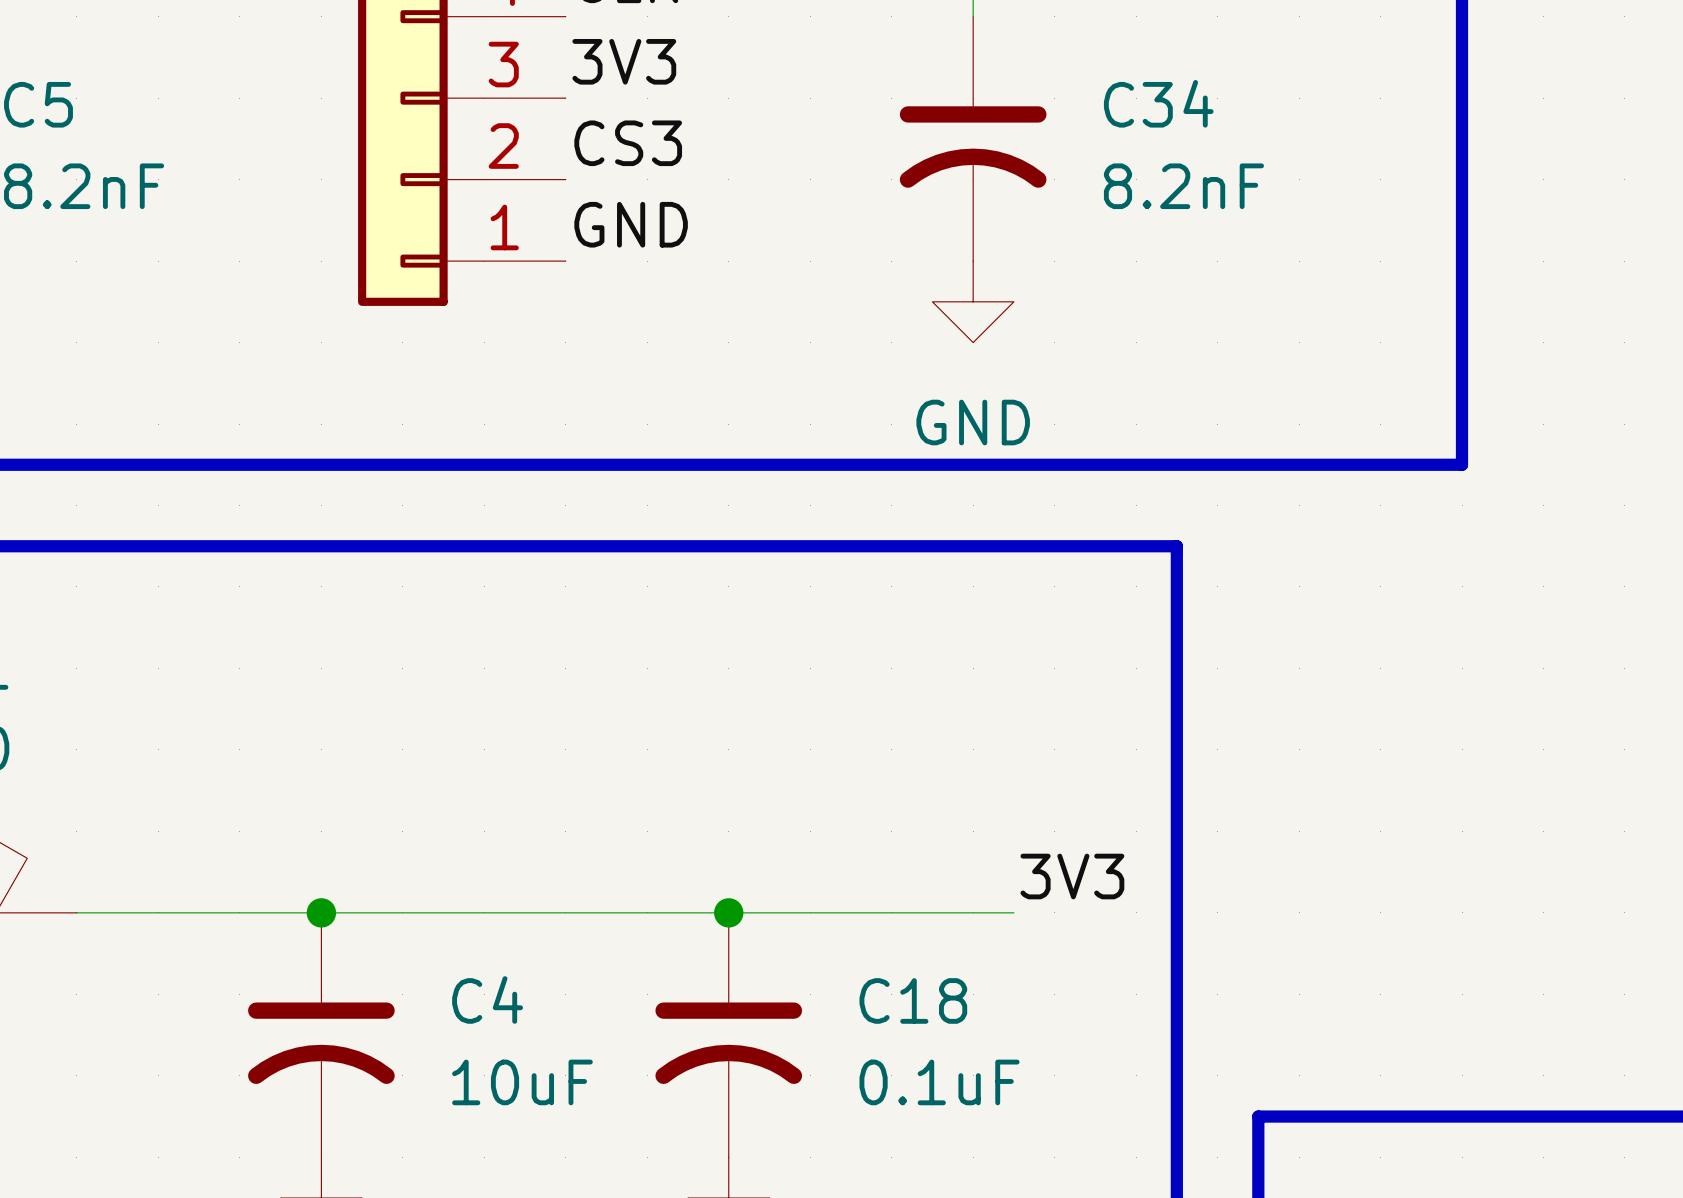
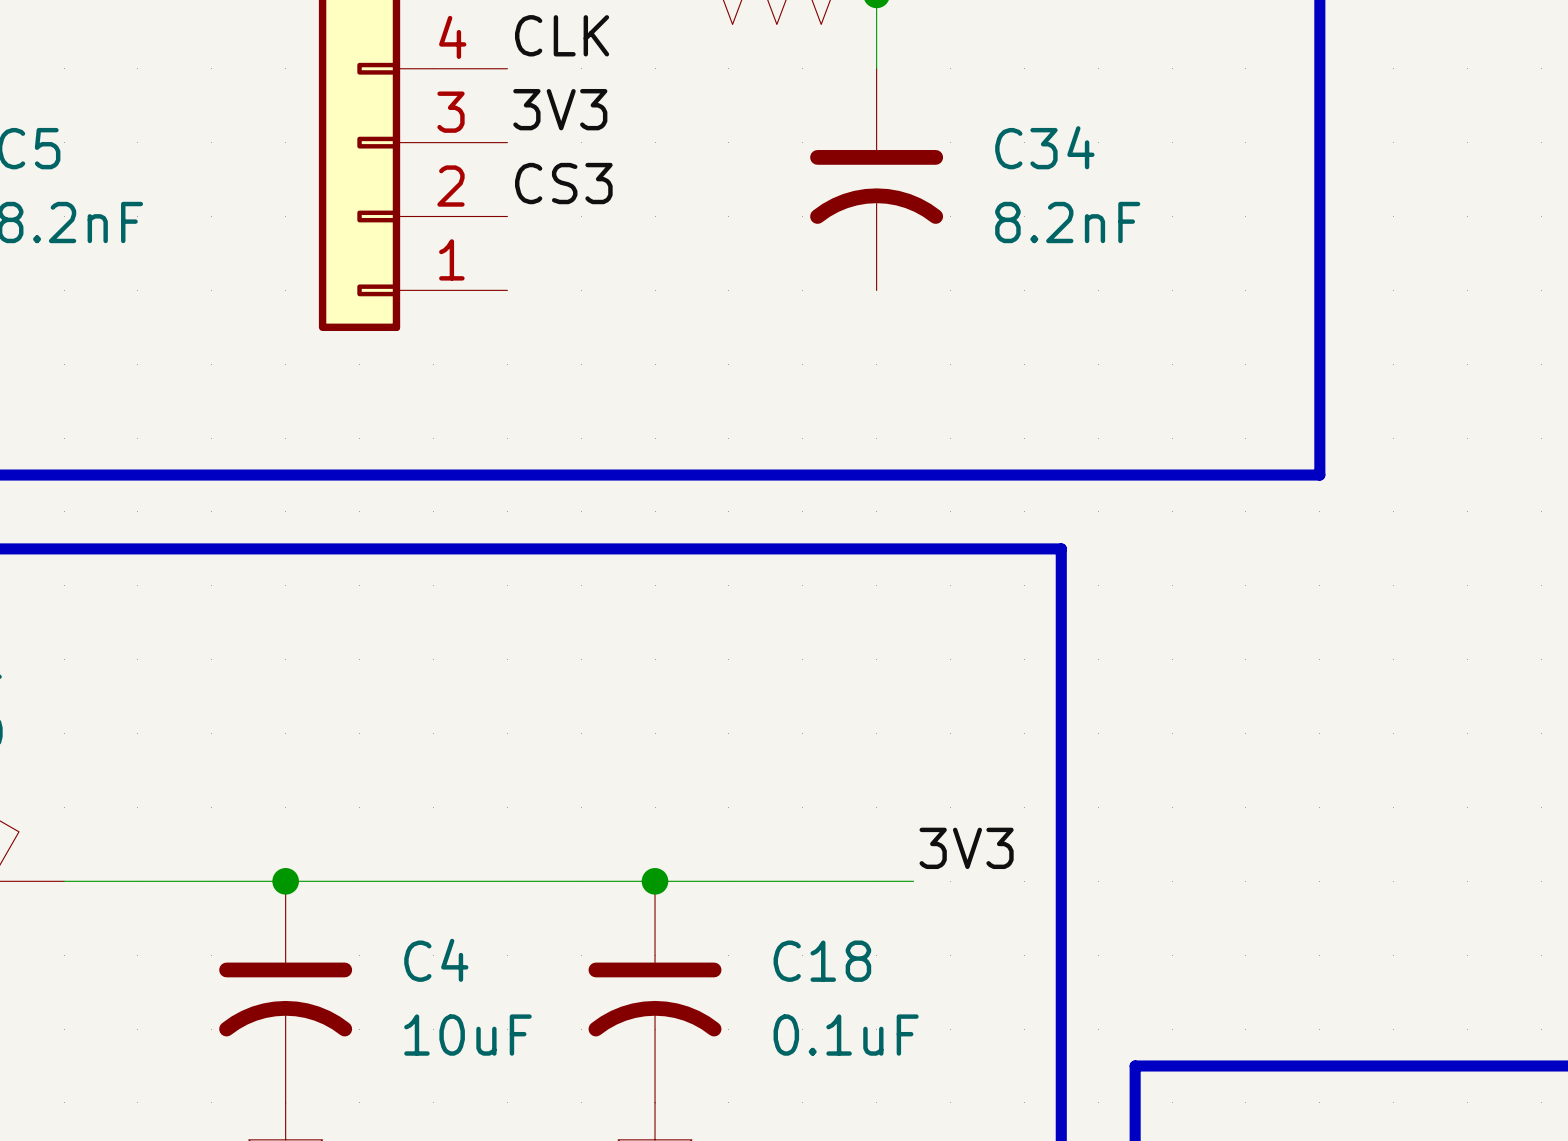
label: GND (631, 224) -> none
power symbol: GND (973, 301) -> none

